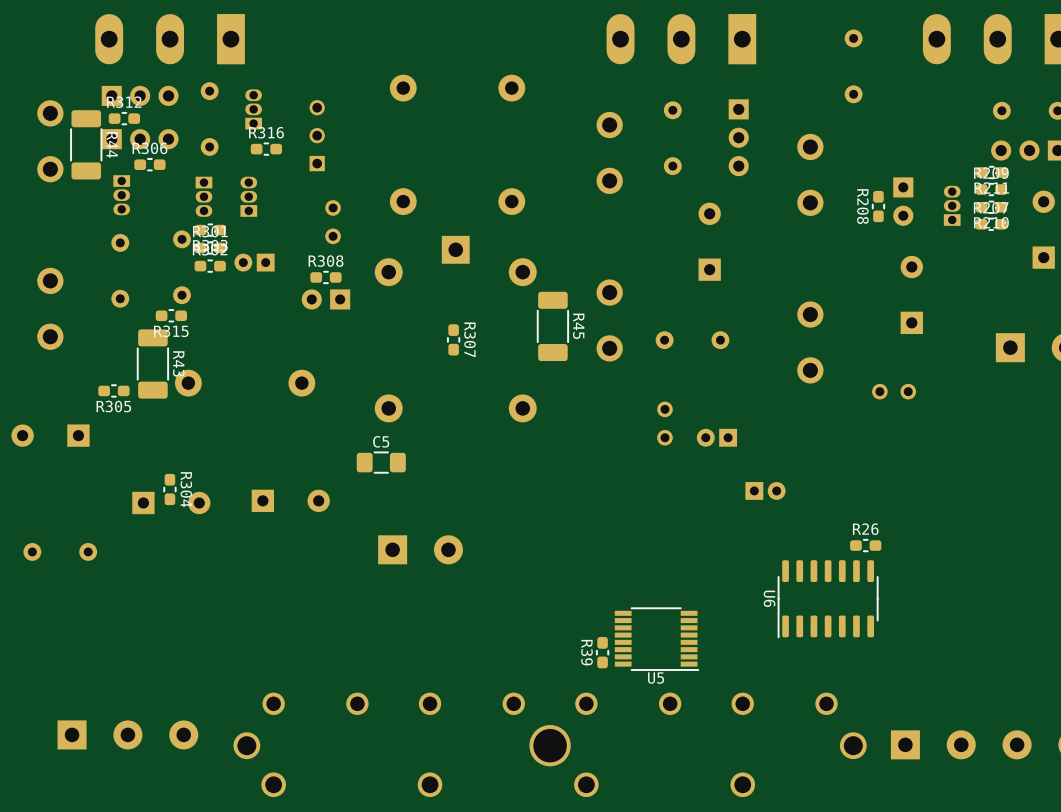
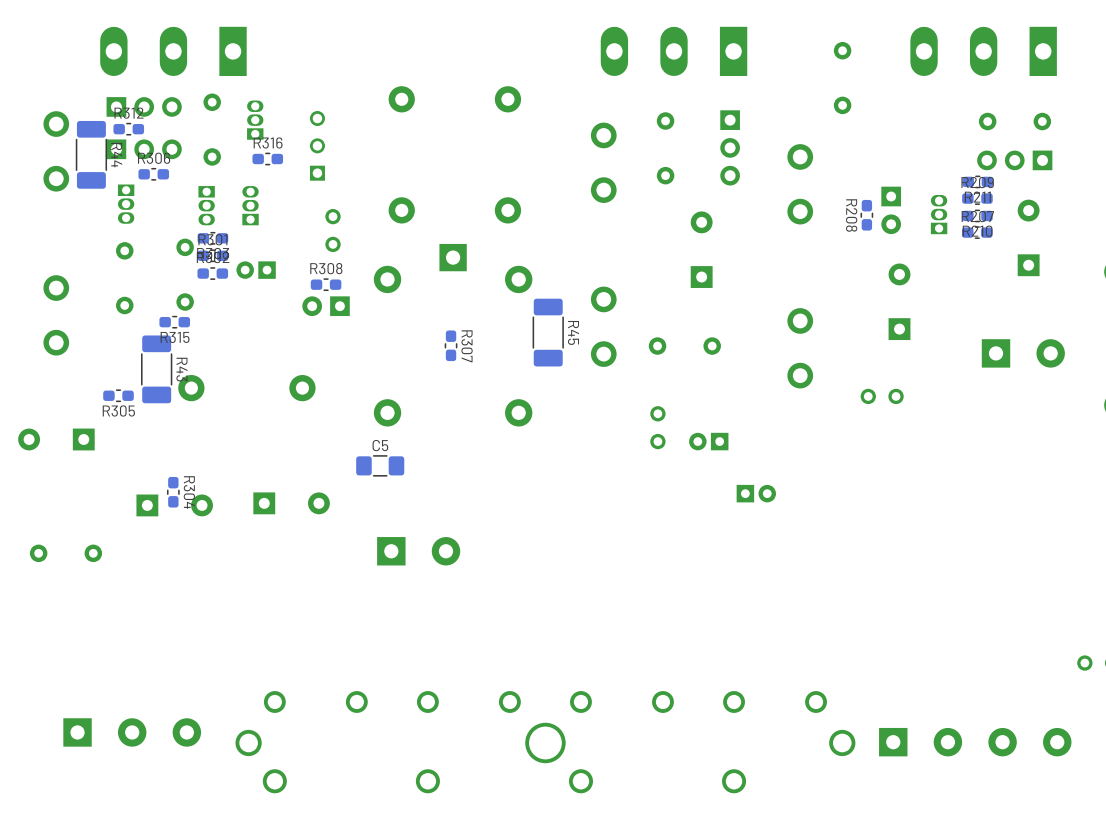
R26: (865, 545) -> none
U6: (828, 599) -> none
U5: (656, 639) -> none
R39: (602, 652) -> none

